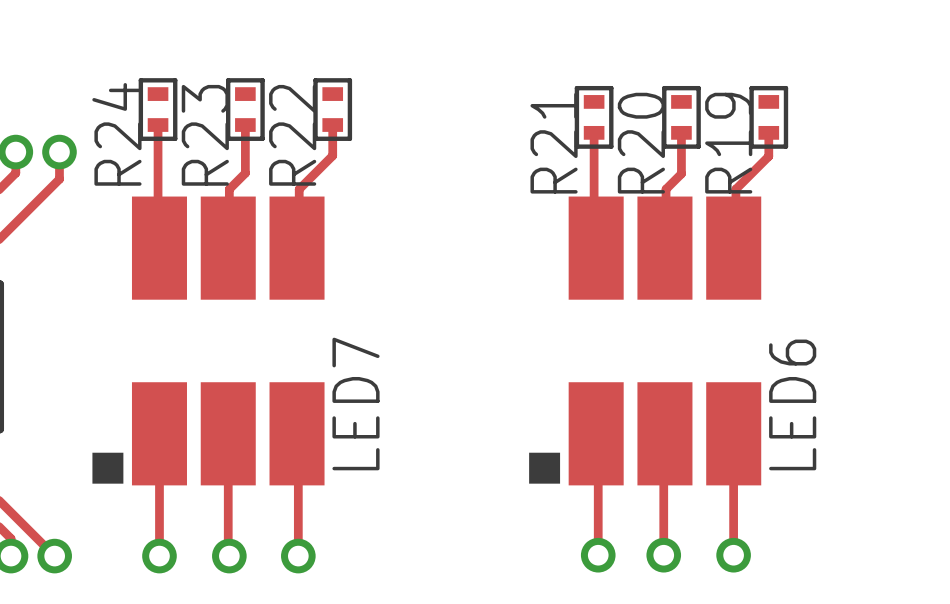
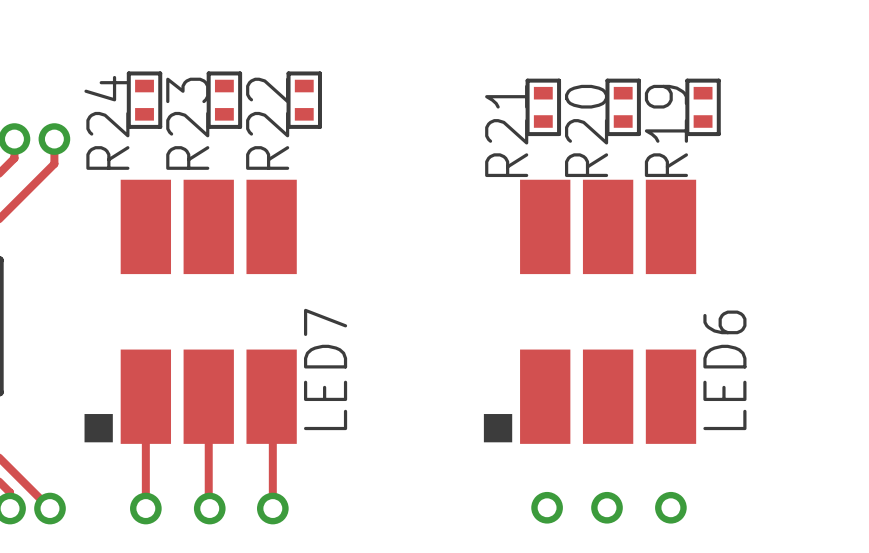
track: (158, 125) (159, 248) -> none
track: (245, 125) (245, 173) (229, 189) (228, 248) -> none
track: (332, 125) (332, 155) (299, 189) (299, 245) (297, 248) -> none
track: (594, 132) (594, 246) (596, 248) -> none
track: (681, 132) (681, 173) (666, 189) (664, 248) -> none
track: (768, 132) (768, 156) (735, 189) (735, 245) (733, 248) -> none
track: (596, 433) (598, 435) (598, 555) -> none
track: (664, 433) (663, 555) -> none
track: (733, 433) (733, 555) -> none

